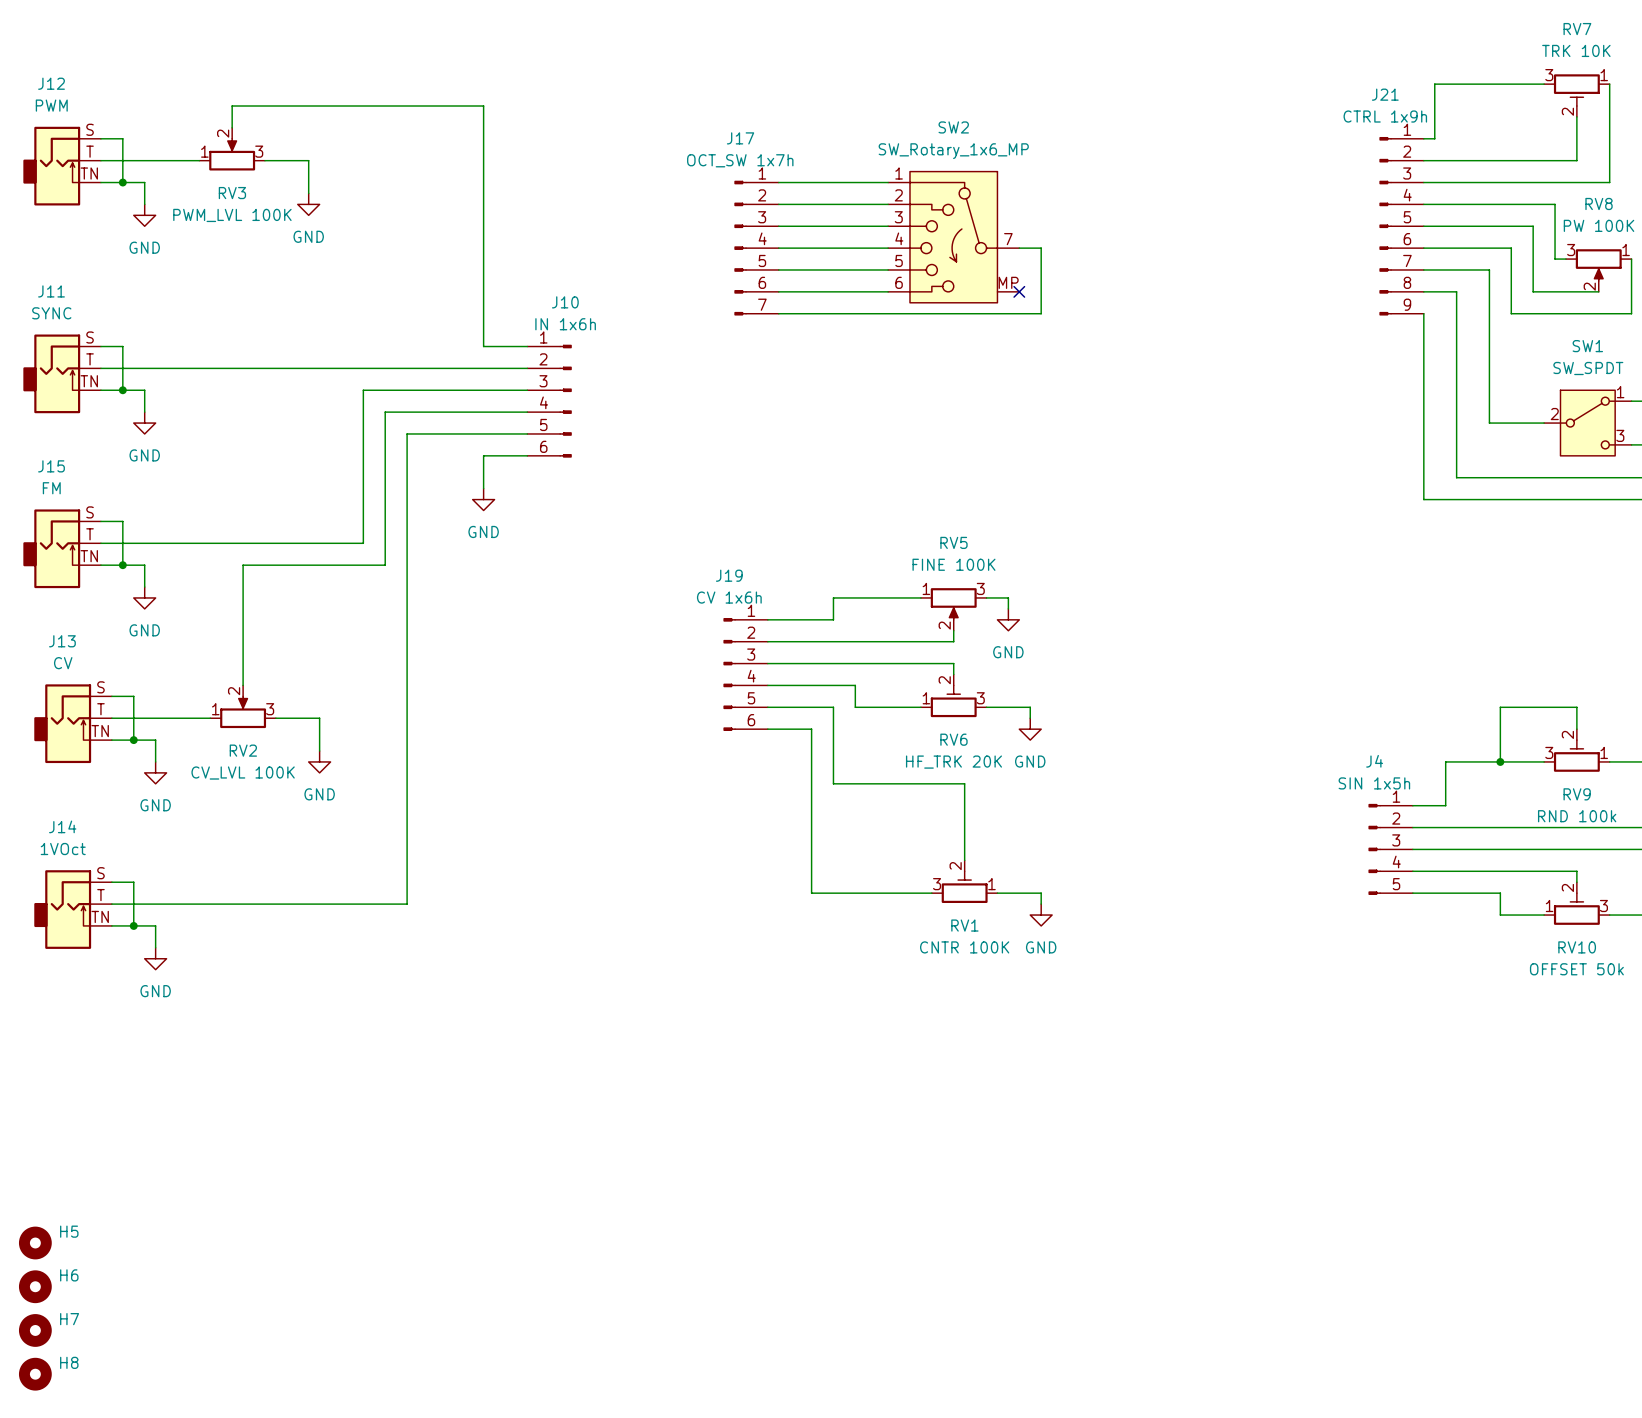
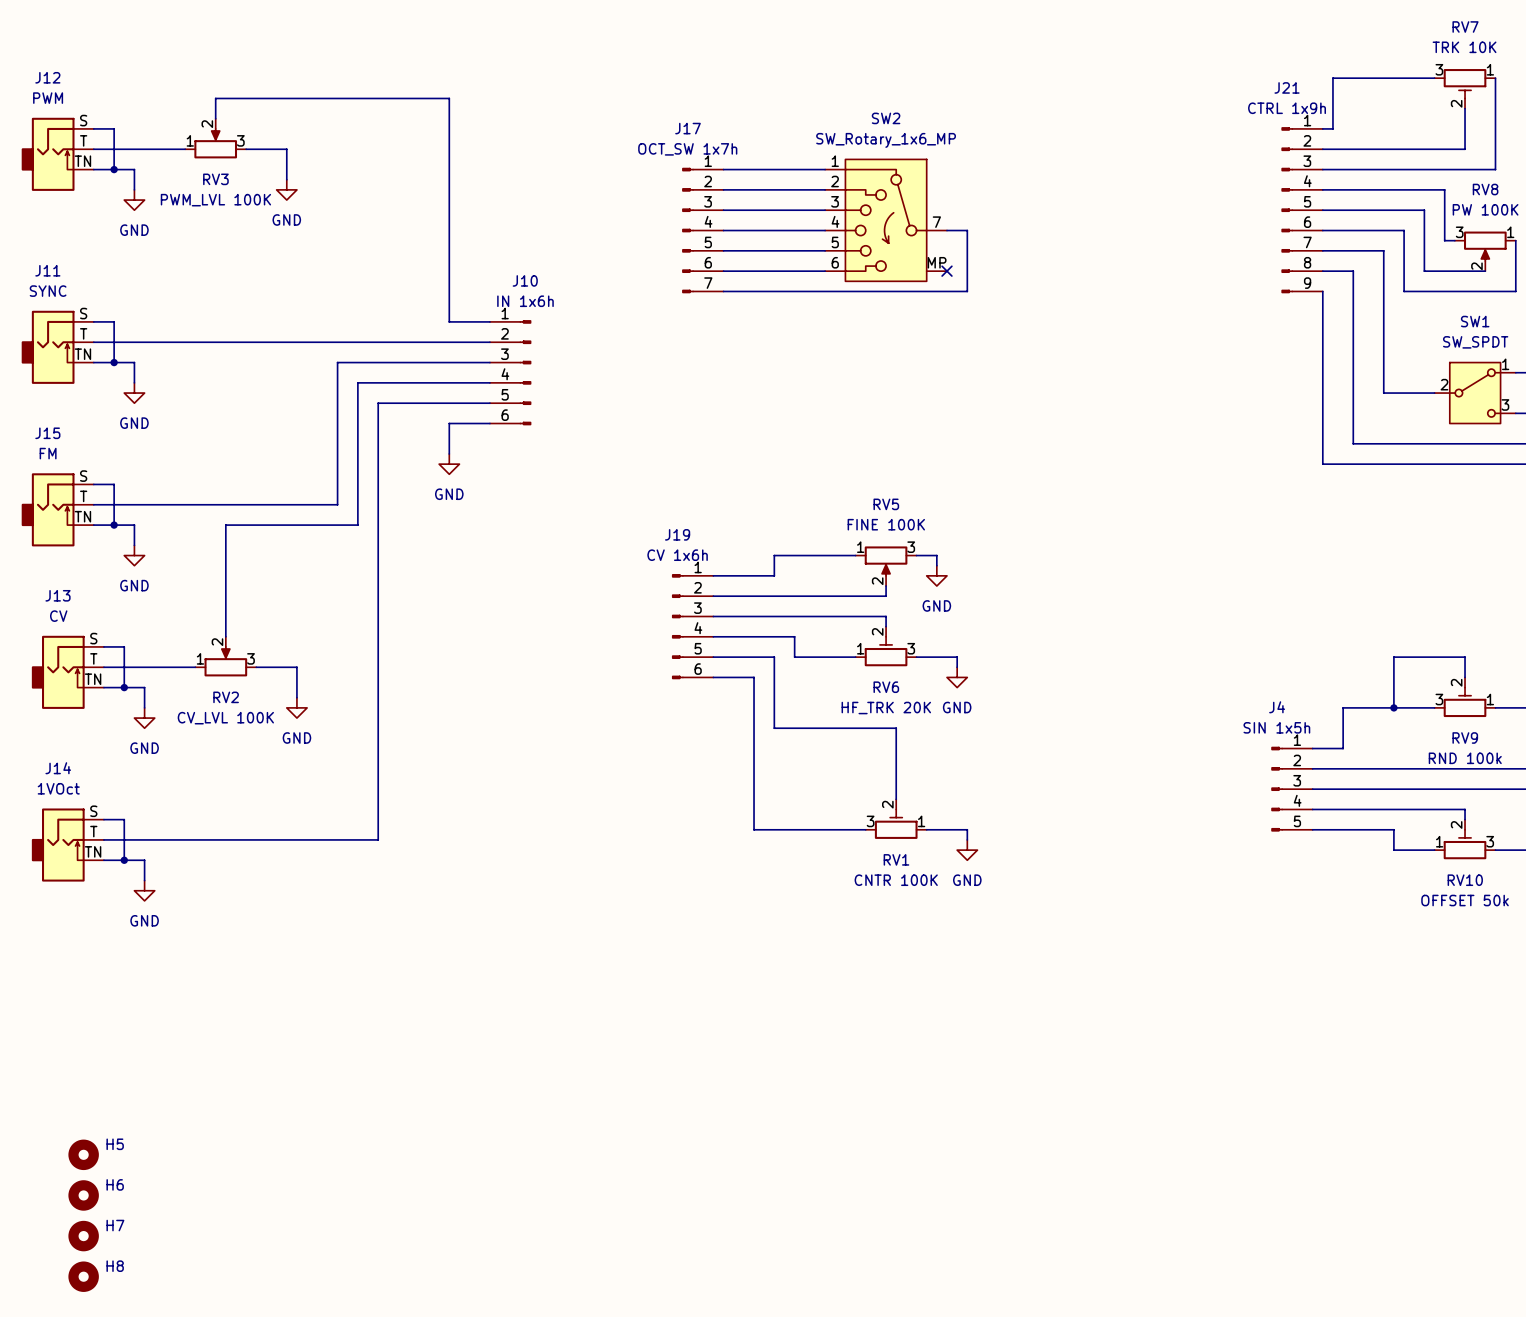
H5 position: (35, 1243) -> (83, 1154)
H6 position: (35, 1286) -> (83, 1195)
H7 position: (35, 1330) -> (83, 1236)
H8 position: (35, 1374) -> (83, 1276)

